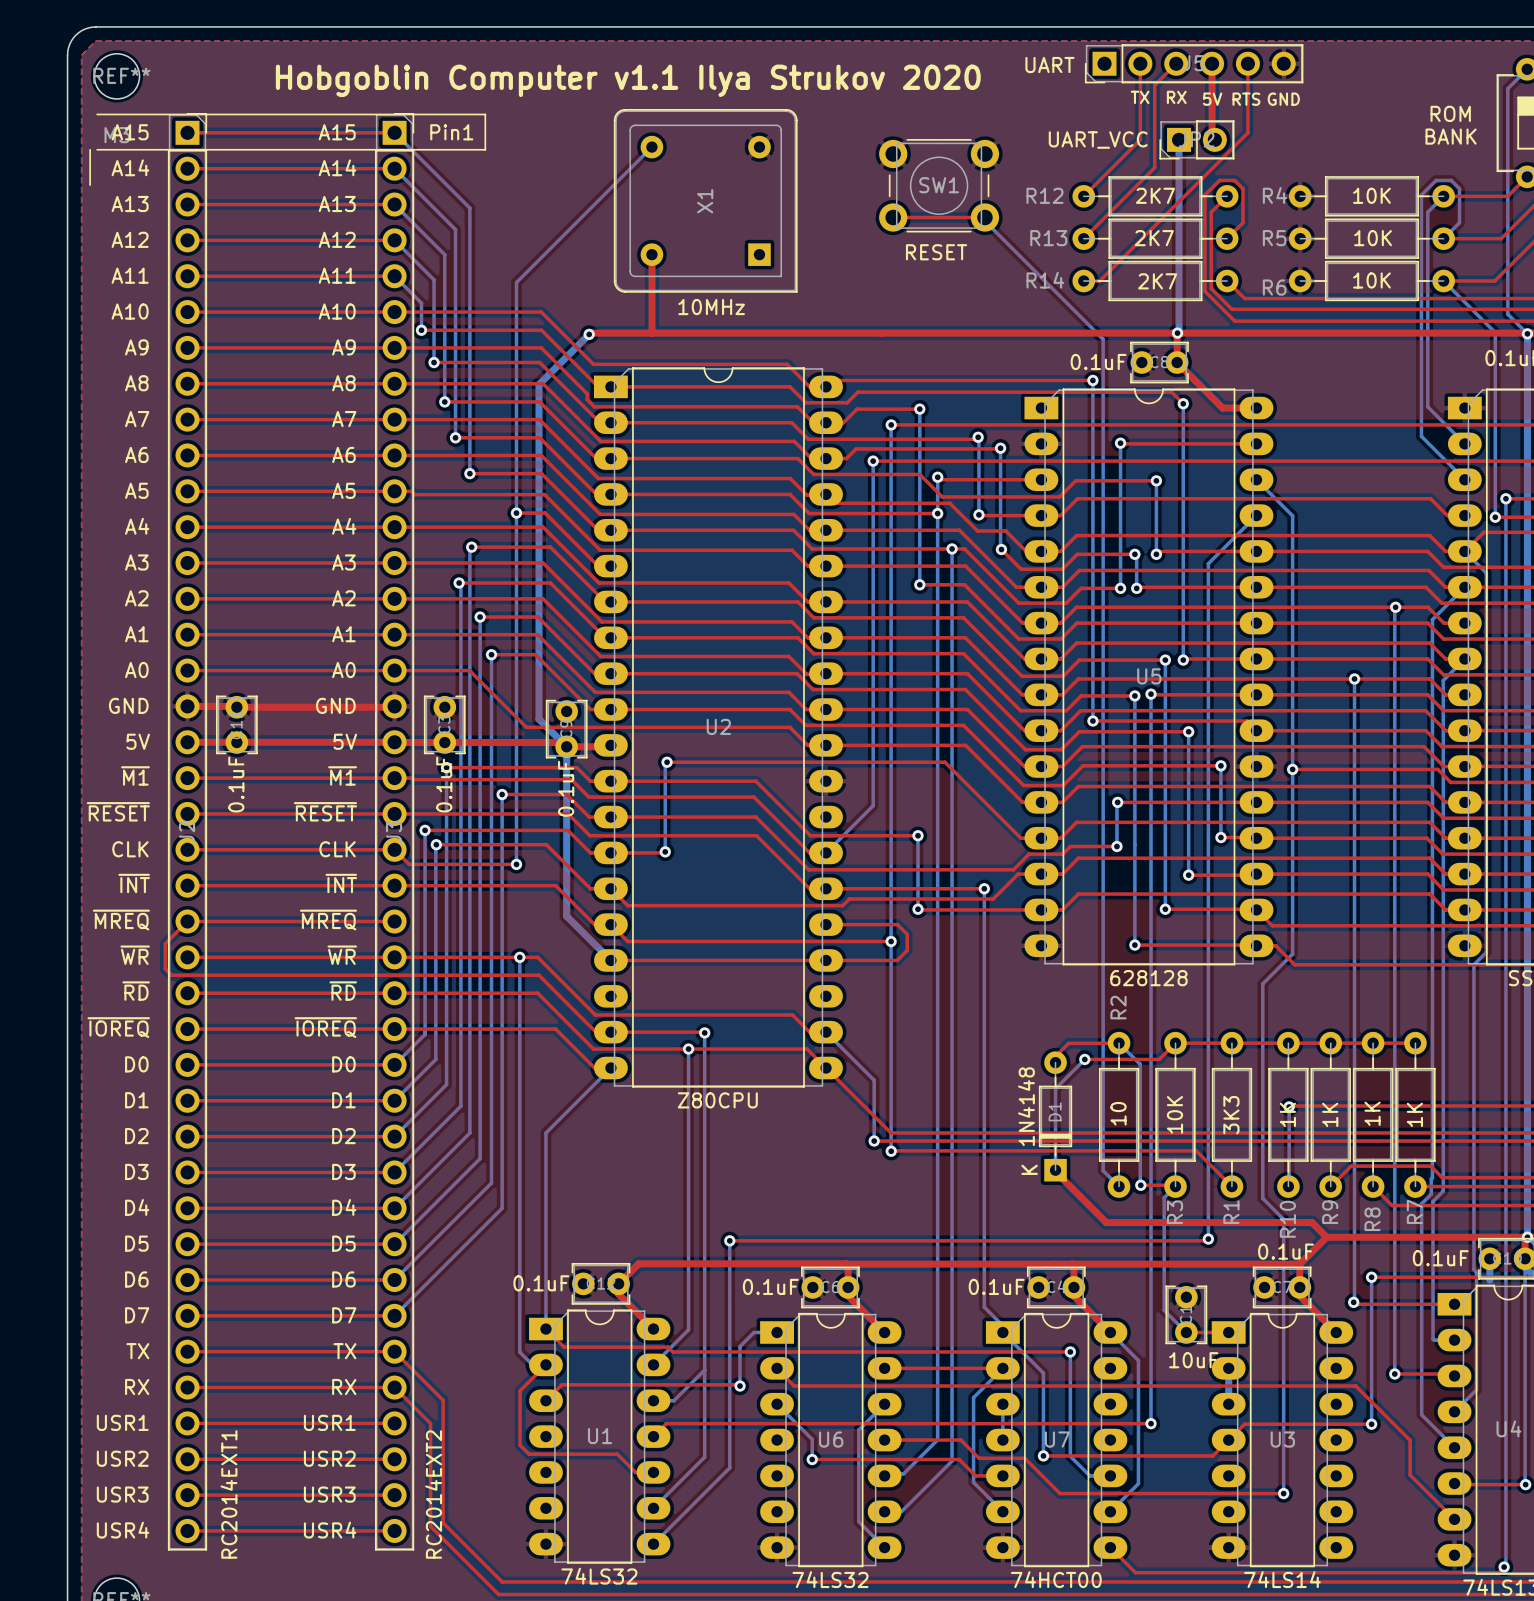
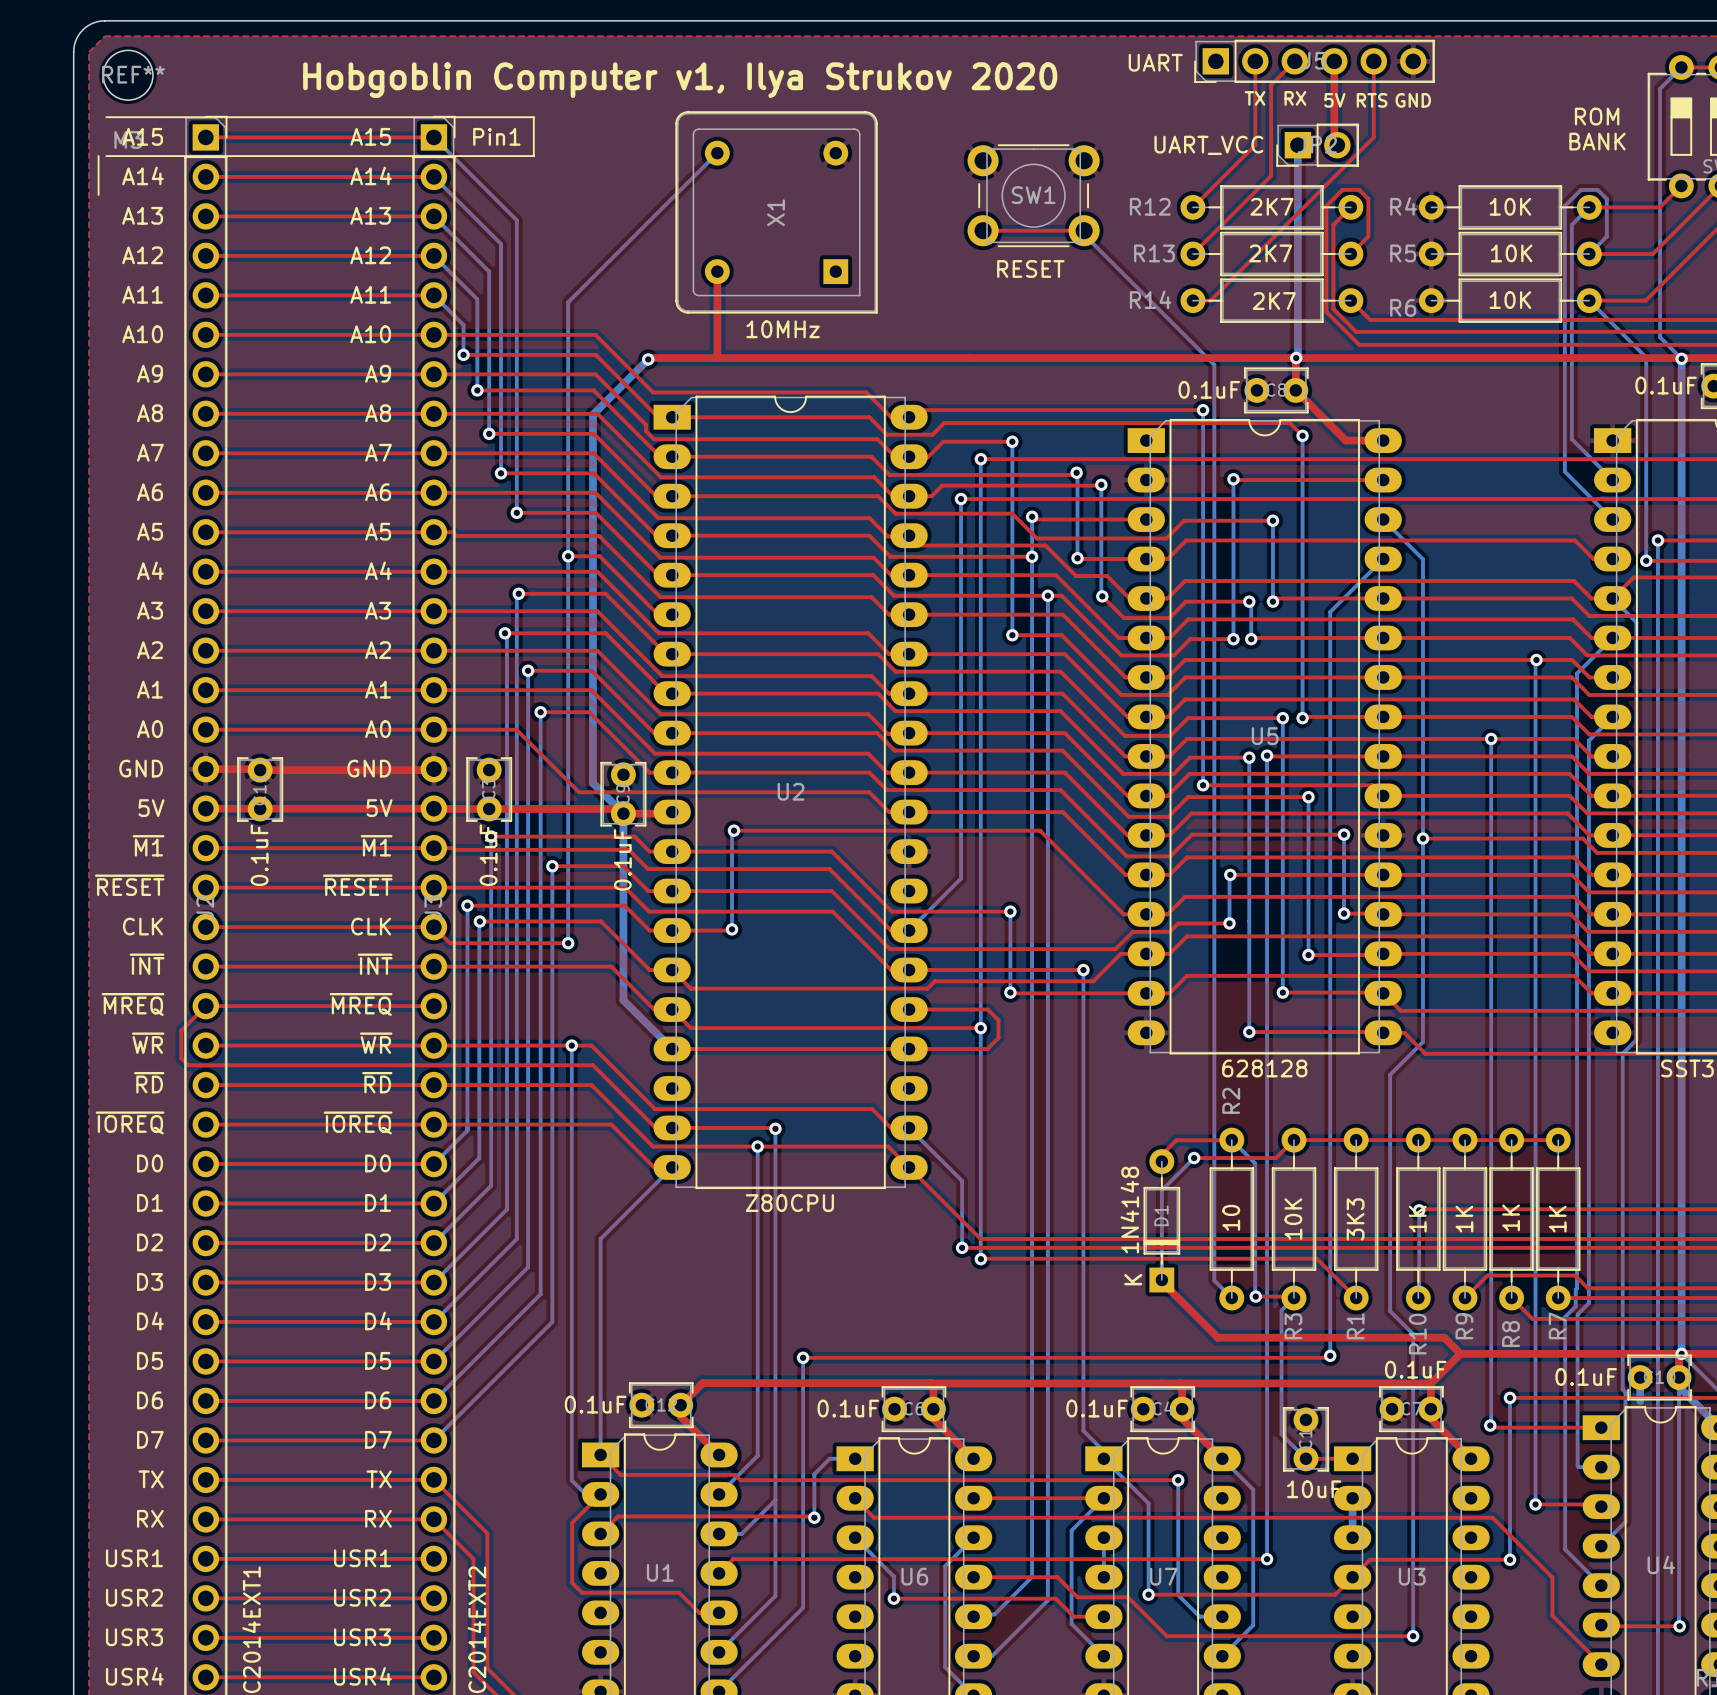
text: Hobgoblin Computer v1.1 Ilya Strukov 2020 (628, 80) -> Hobgoblin Computer v1, Ilya Strukov 2020 (680, 80)

